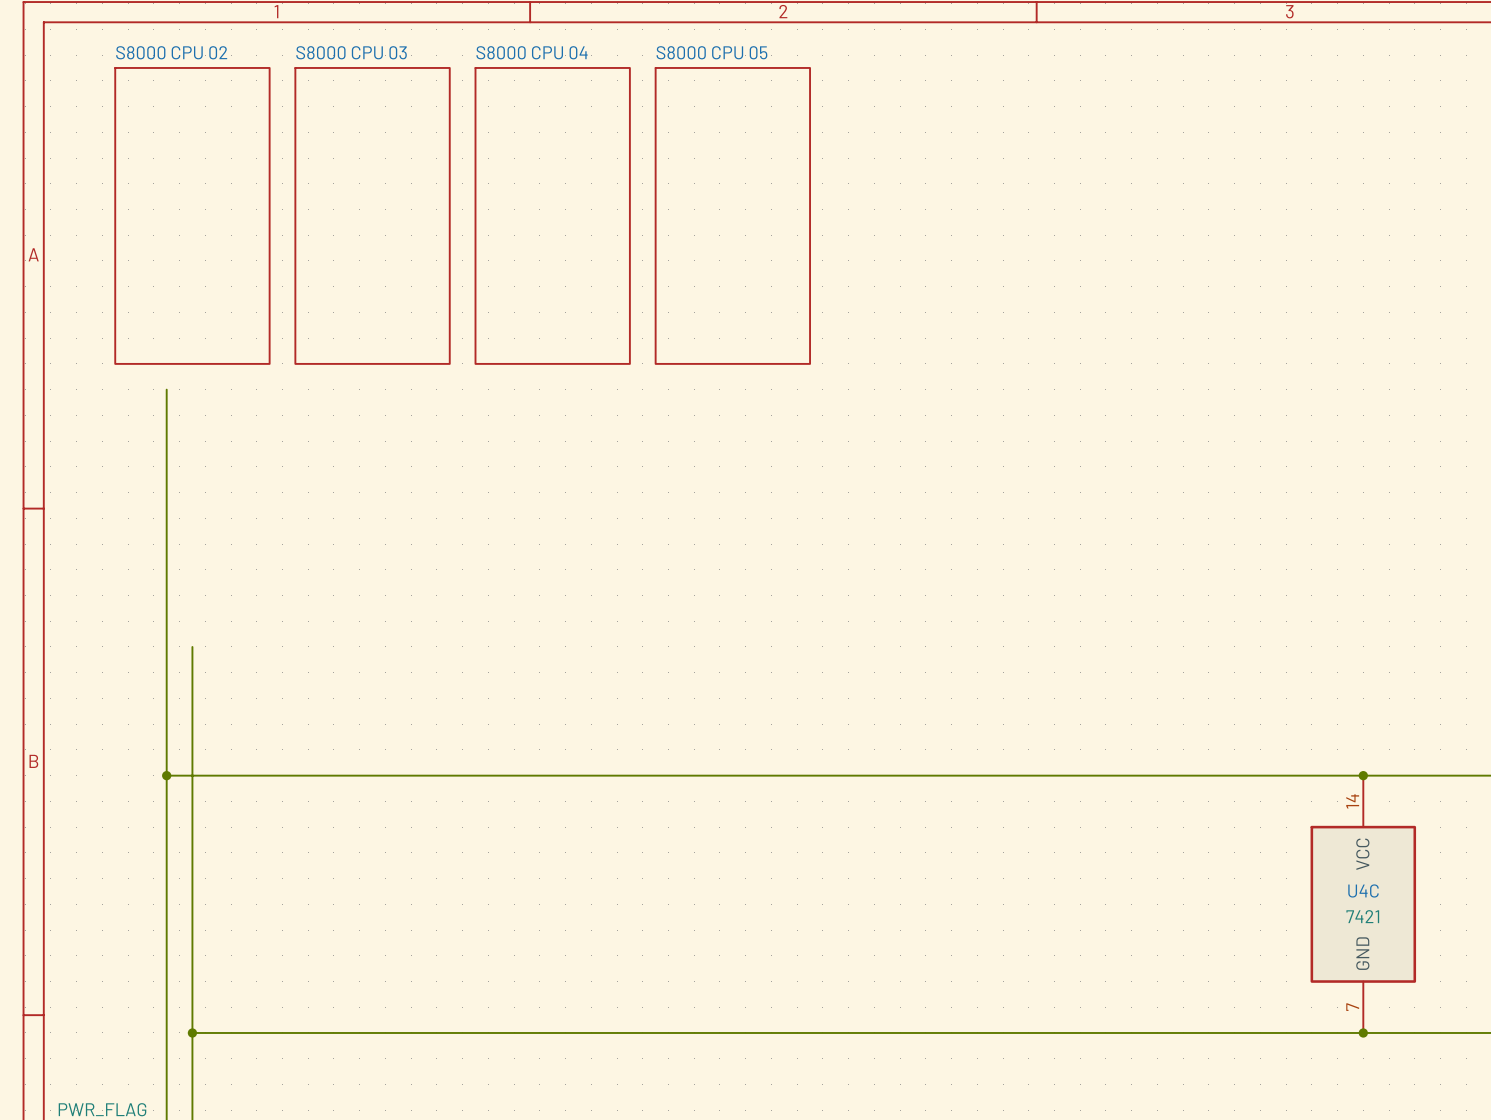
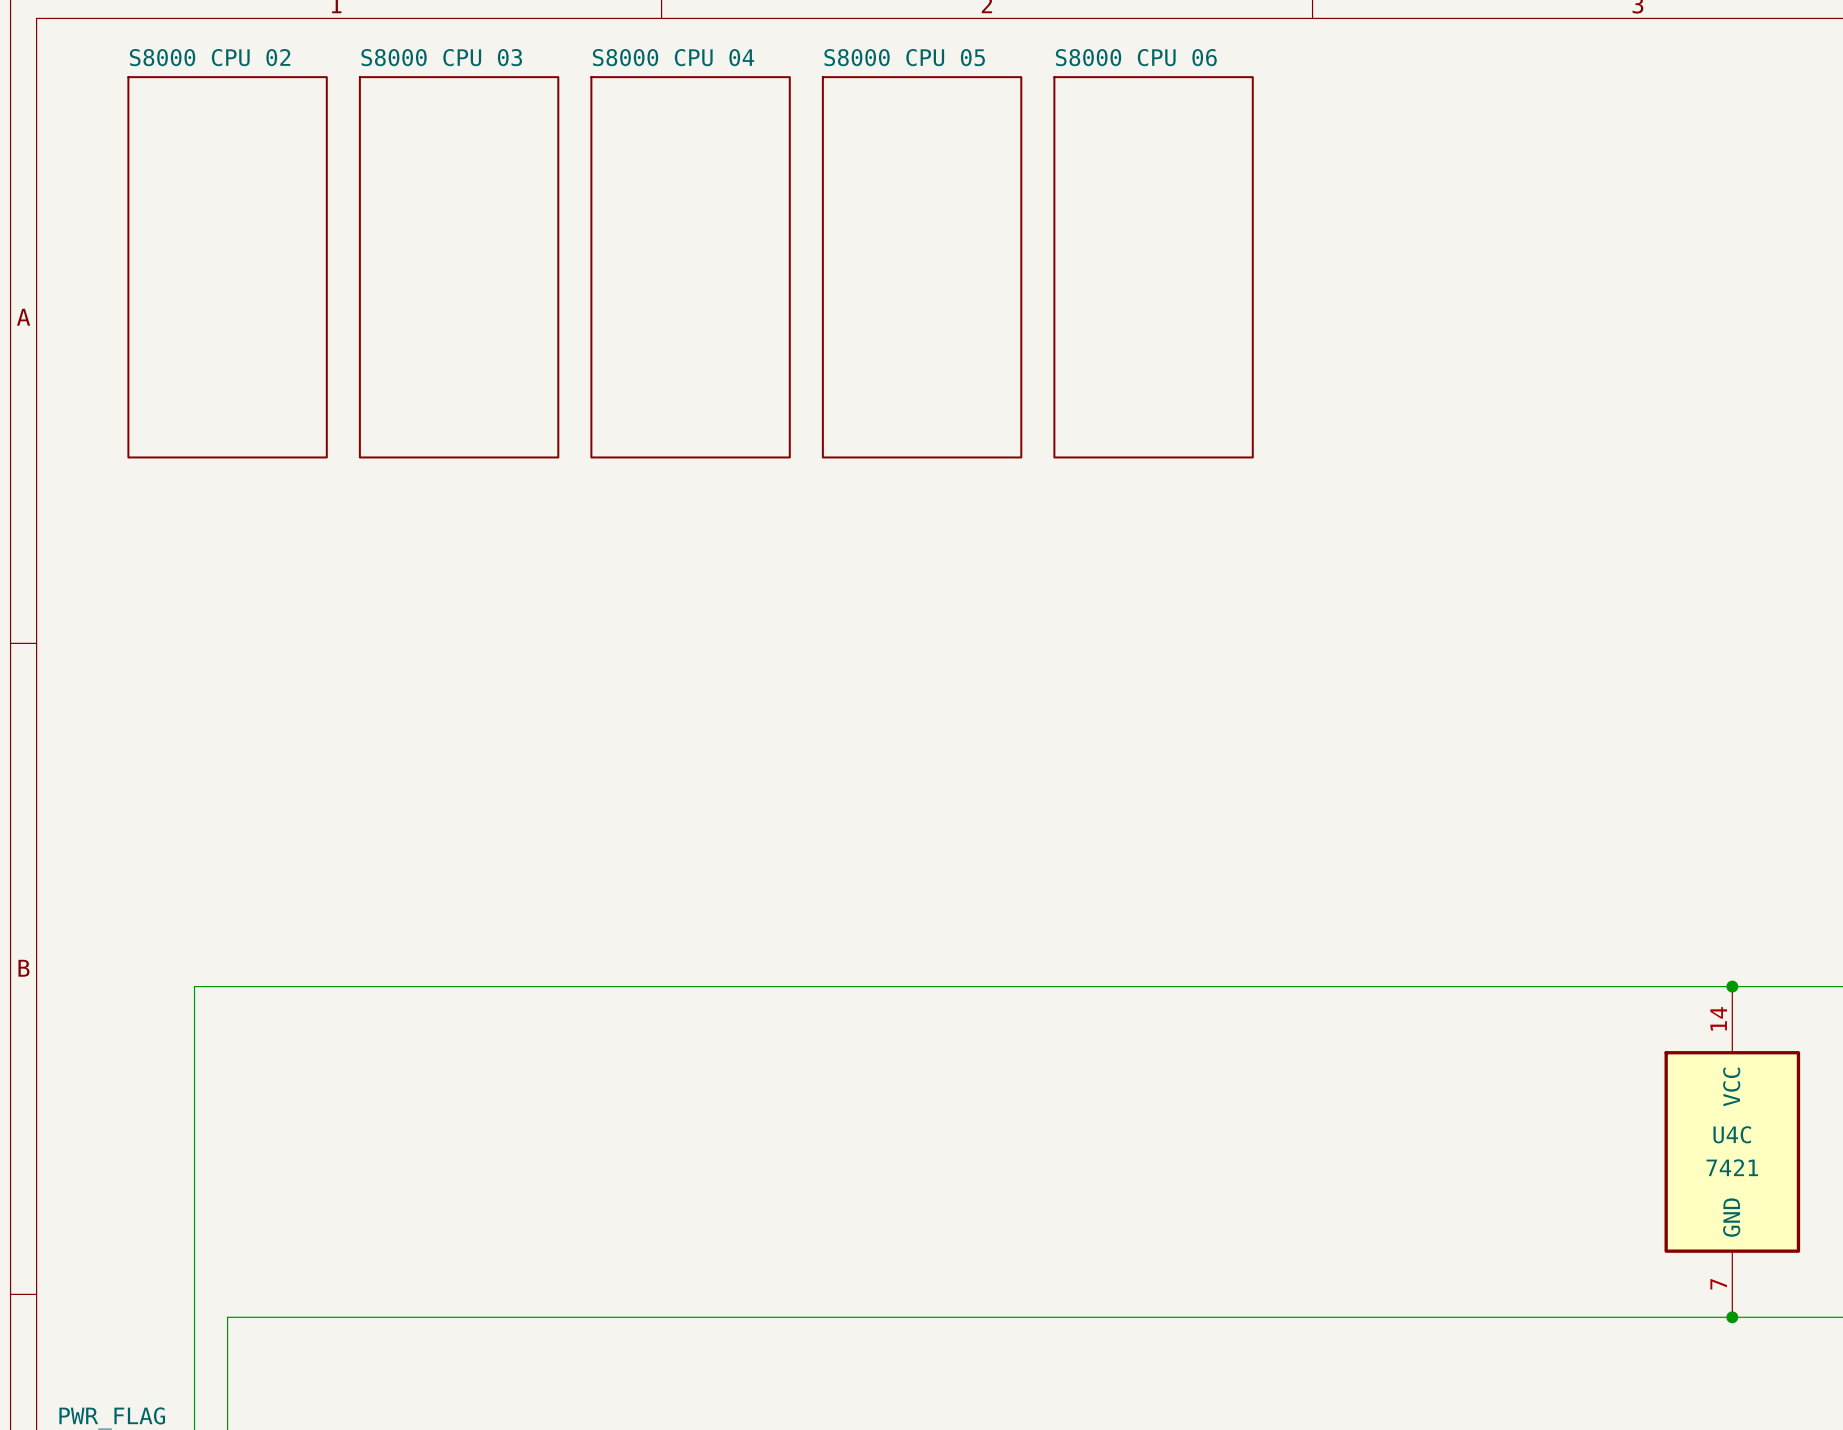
sheet S8000 CPU 06: none -> (1153, 267)
wire: (166, 389) (166, 775) -> none
wire: (192, 646) (192, 1032) -> none
junction: (166, 775) -> none
junction: (192, 1032) -> none

